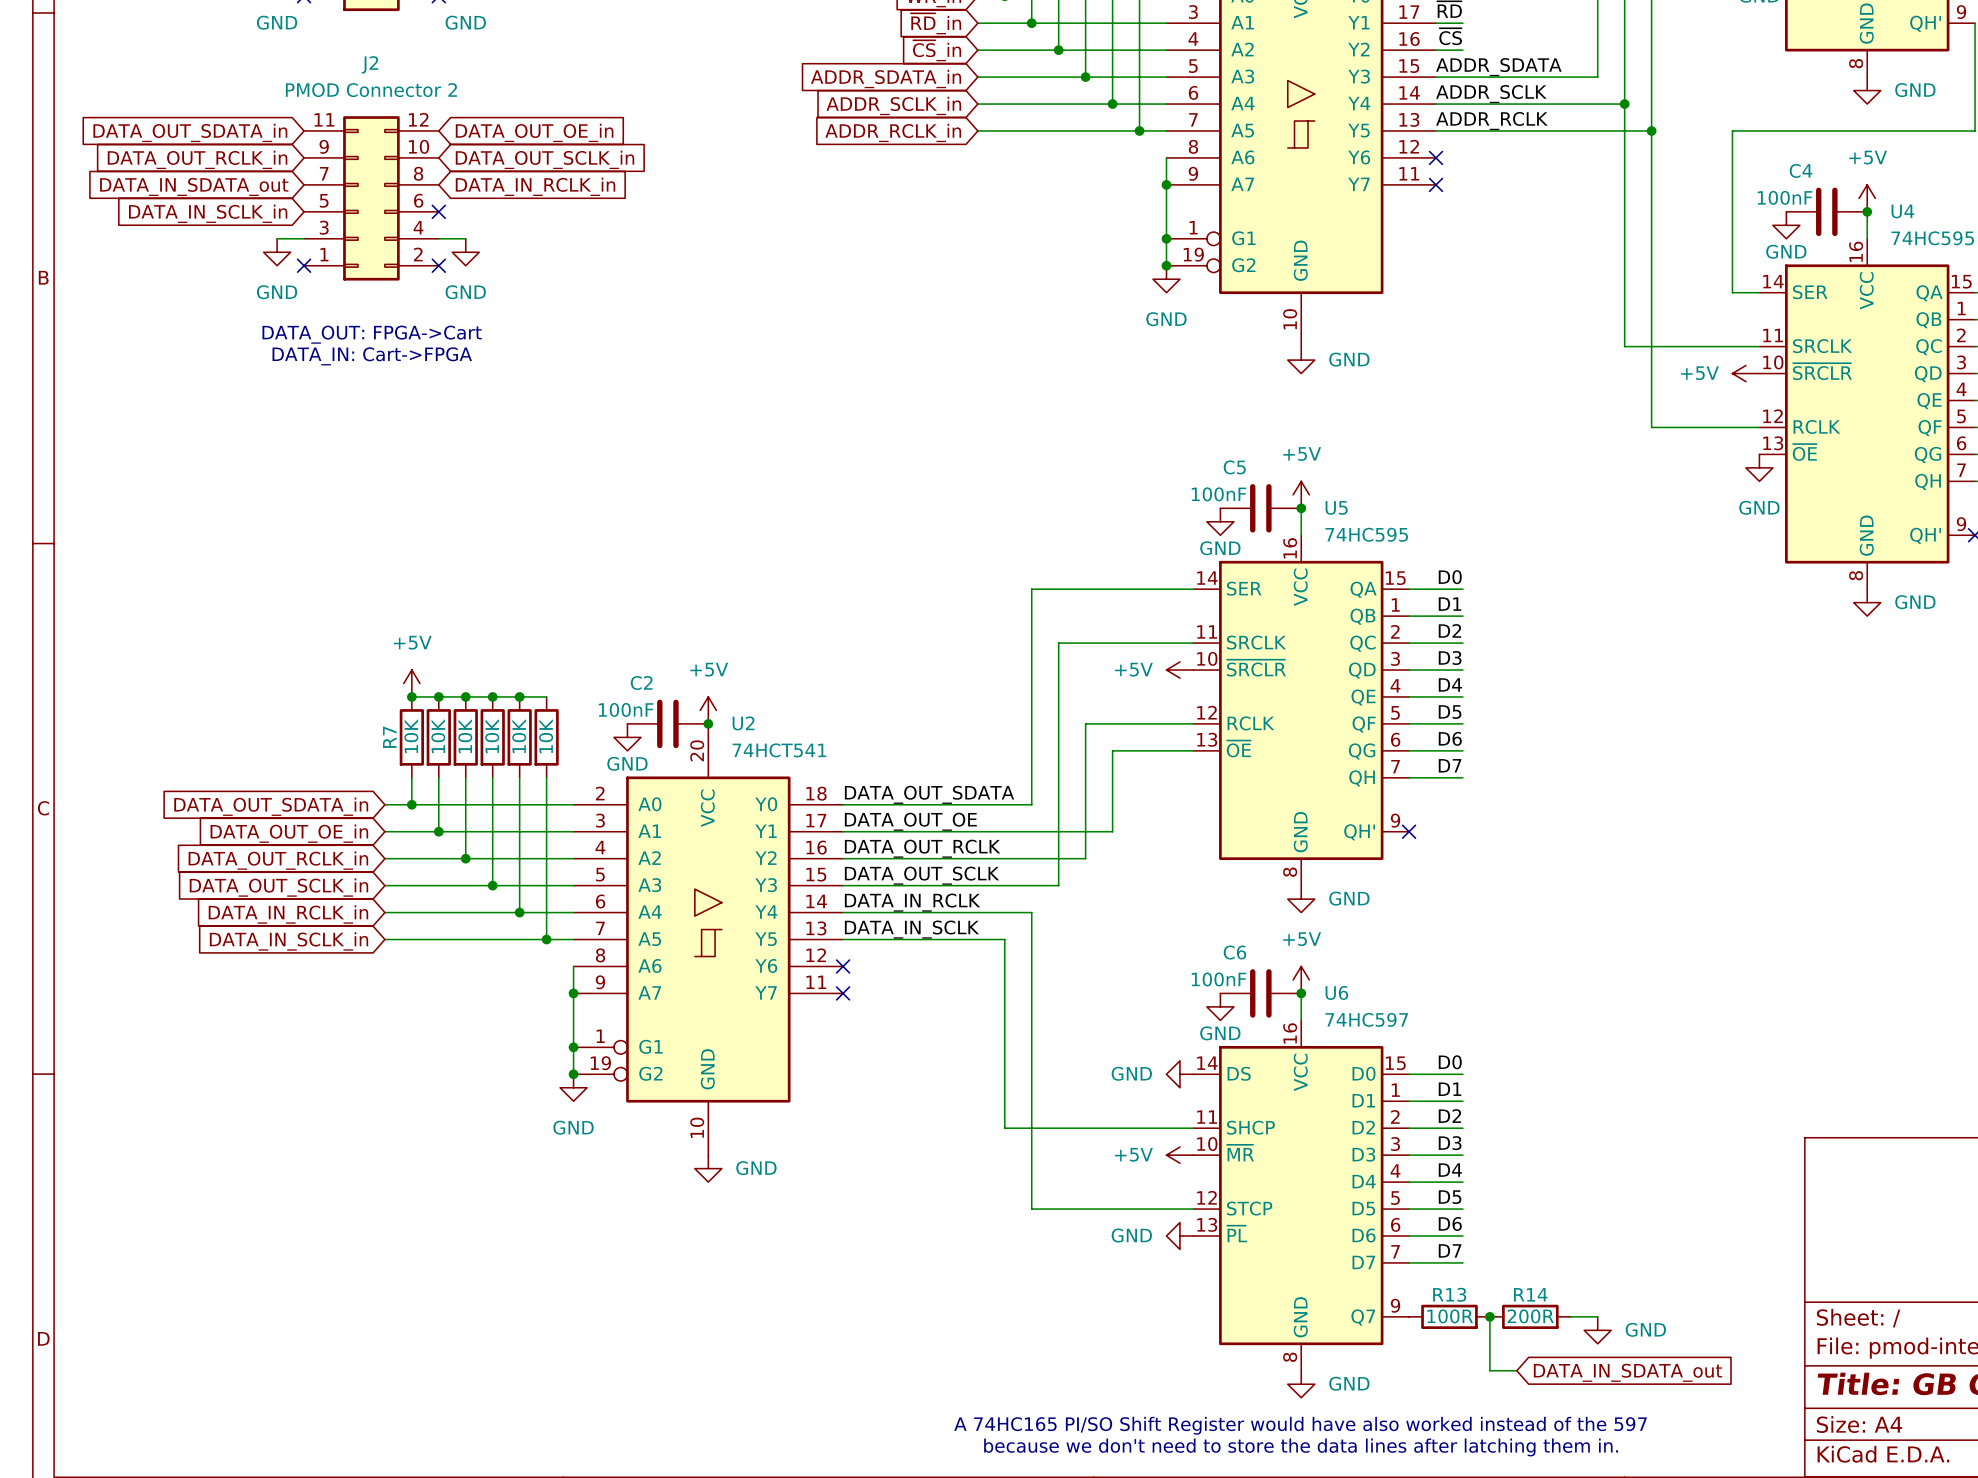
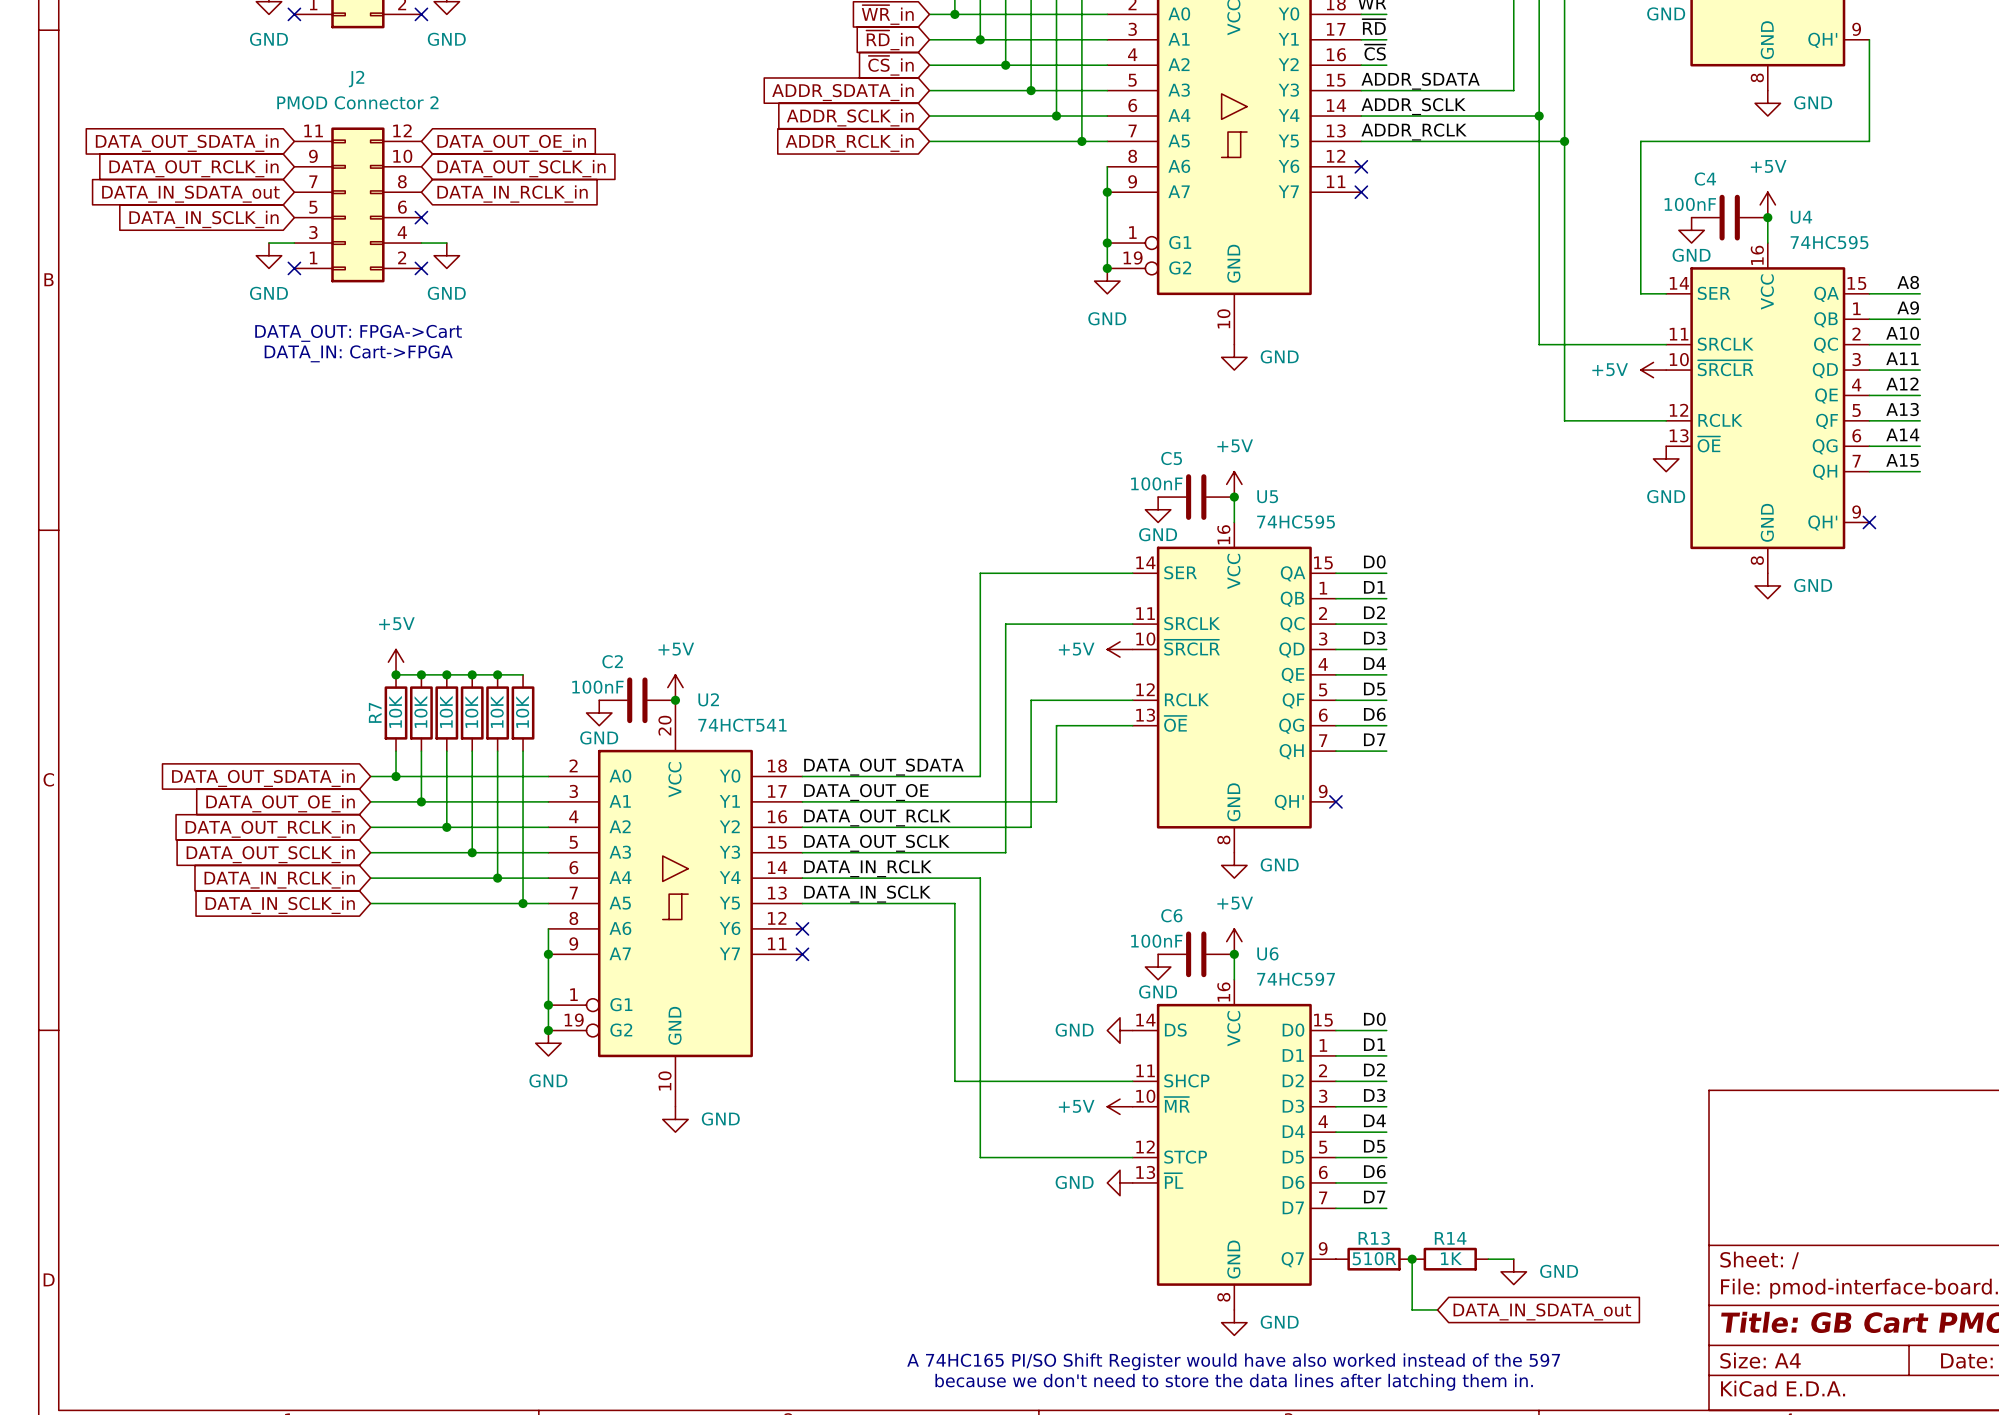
R13 value: 100R (1450, 1316) -> 510R (1374, 1258)
R14 value: 200R (1530, 1316) -> 1K (1451, 1258)

